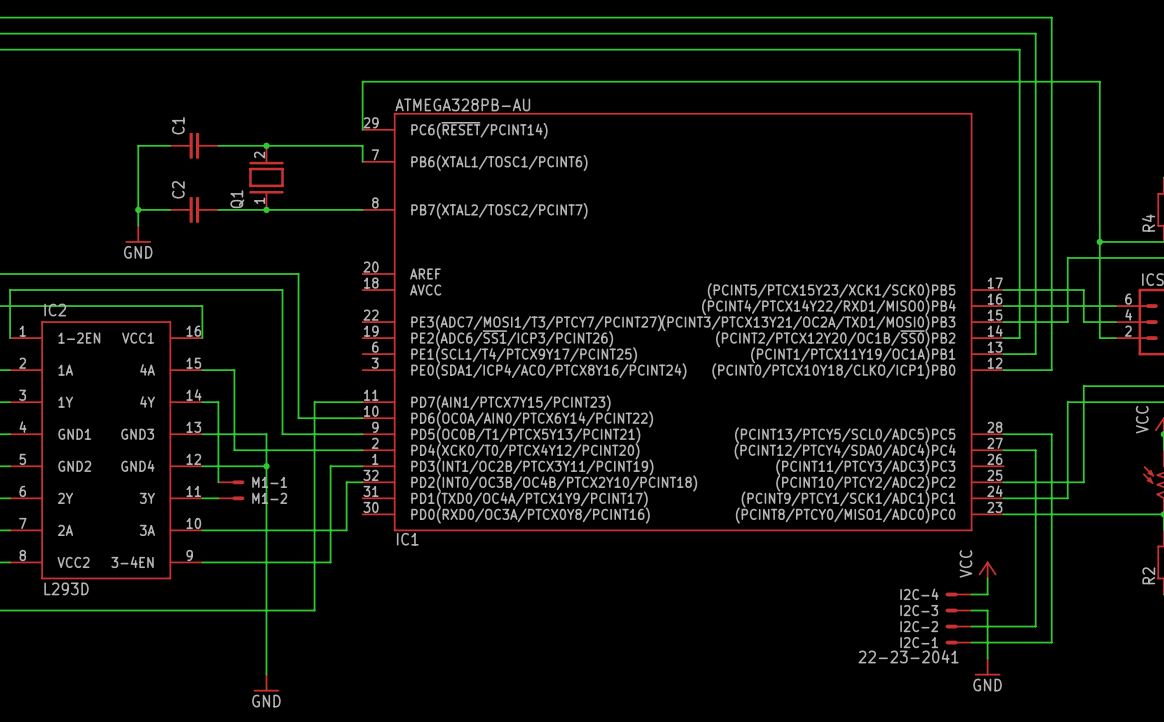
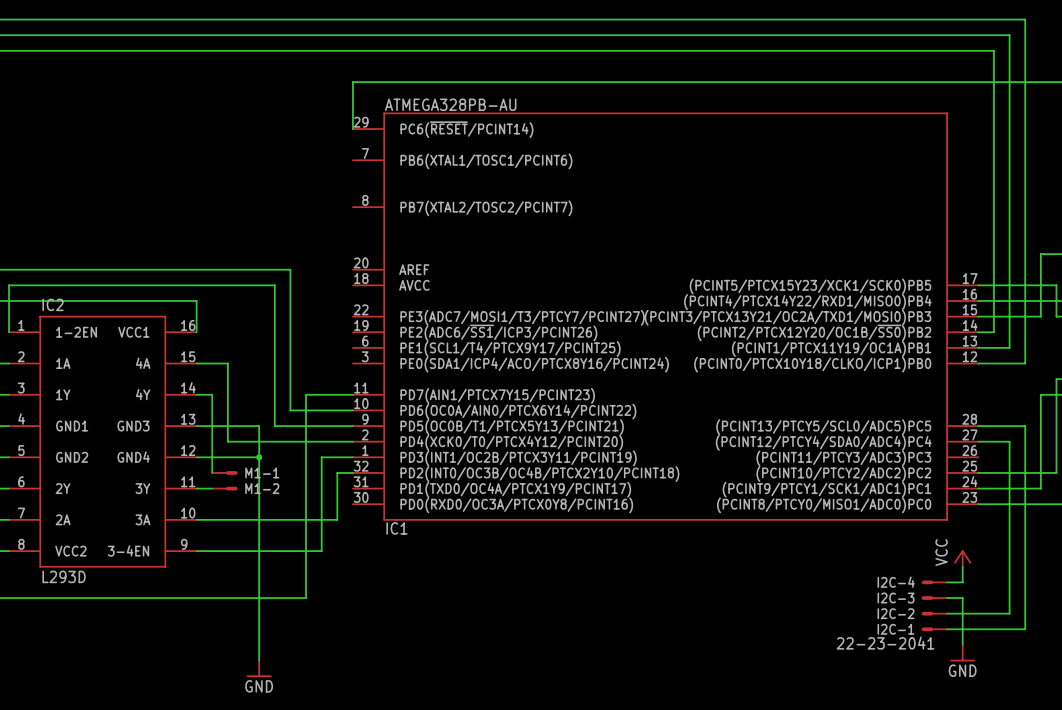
wire: (170, 145) (138, 145) (138, 225) -> none
C1: (194, 145) -> none
wire: (218, 145) (362, 145) (362, 161) -> none
junction: (266, 145) -> none
Q1: (266, 177) -> none
wire: (138, 209) (170, 209) -> none
junction: (138, 209) -> none
C2: (194, 209) -> none
wire: (218, 209) (362, 209) -> none
junction: (266, 209) -> none
power symbol: GND (138, 234) -> none

